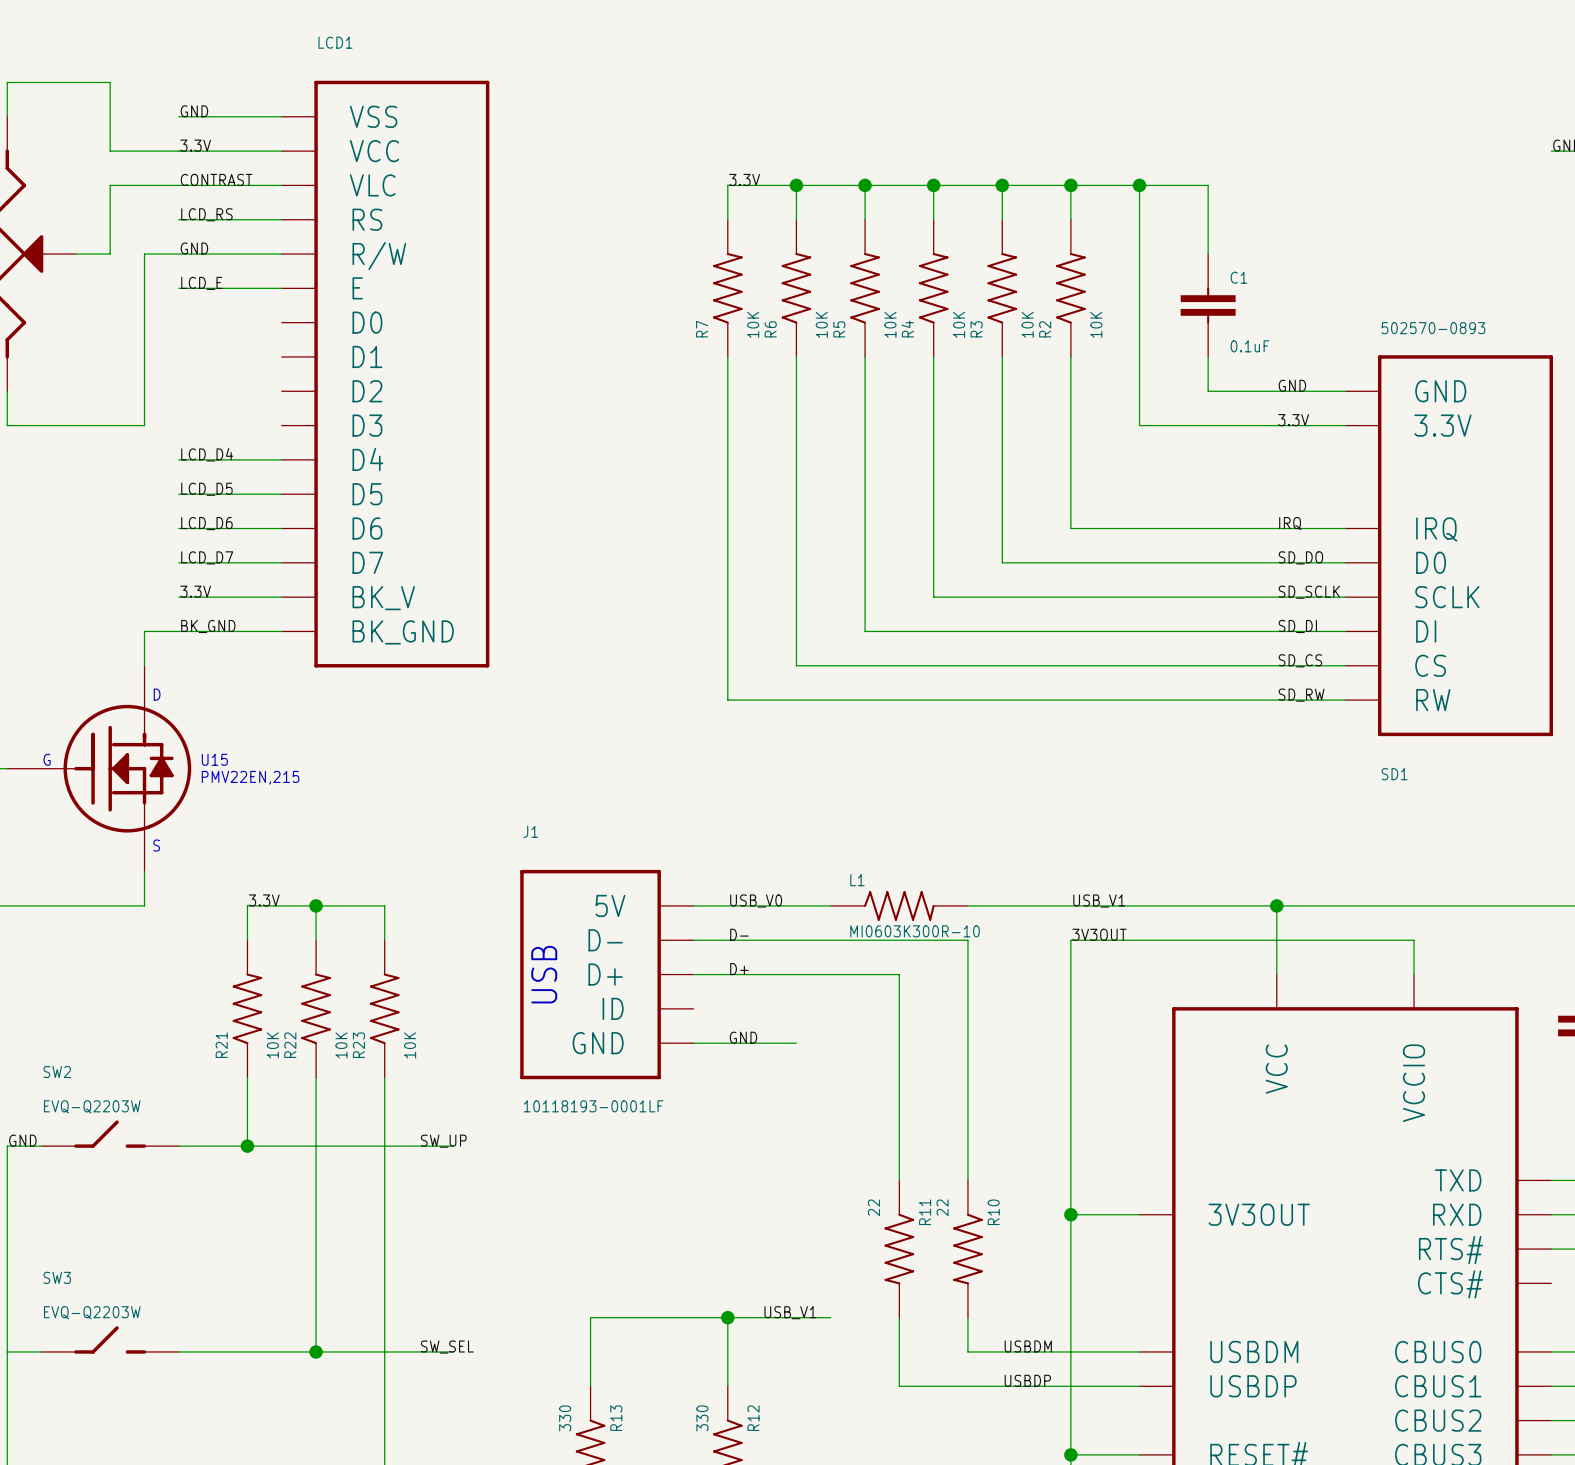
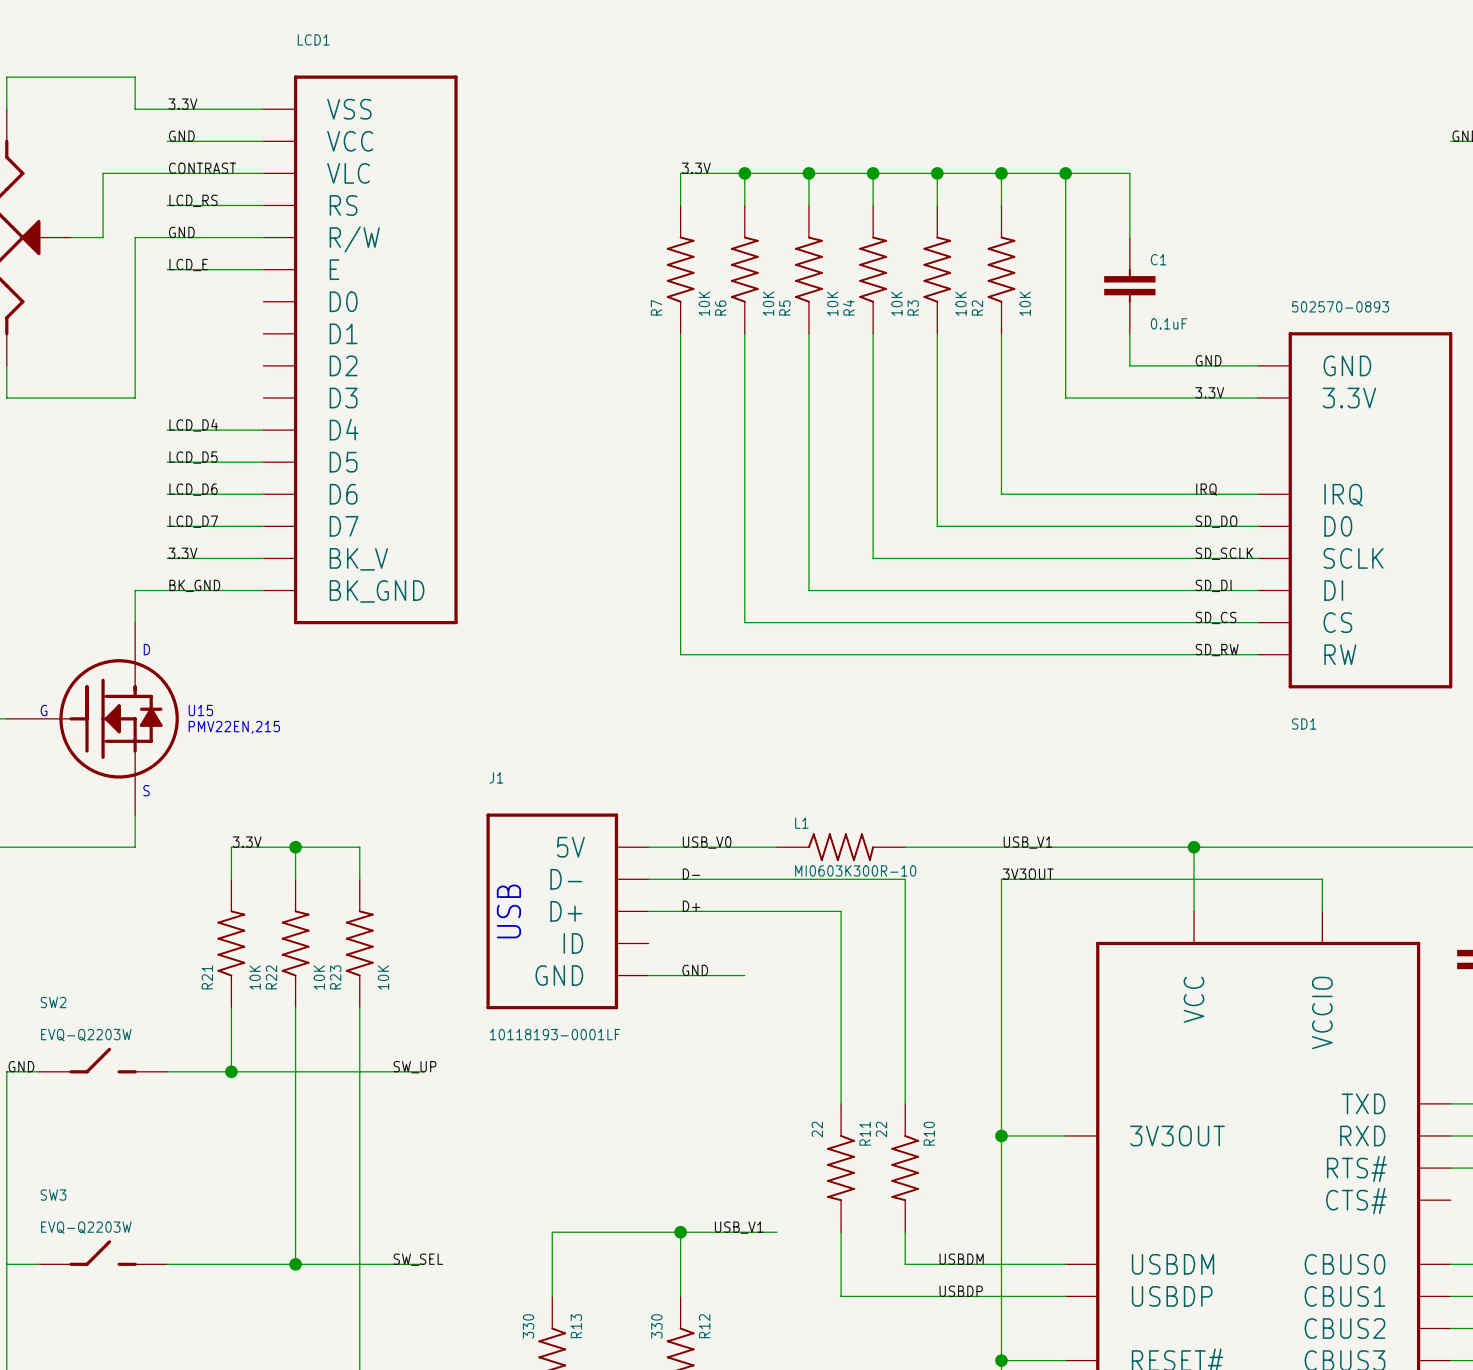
wire: (110, 82) (110, 151) (178, 151) -> (103, 77) (135, 77) (135, 109) (167, 109)
label: GND (194, 111) -> 3.3V (182, 104)
label: 3.3V (195, 145) -> GND (181, 136)

